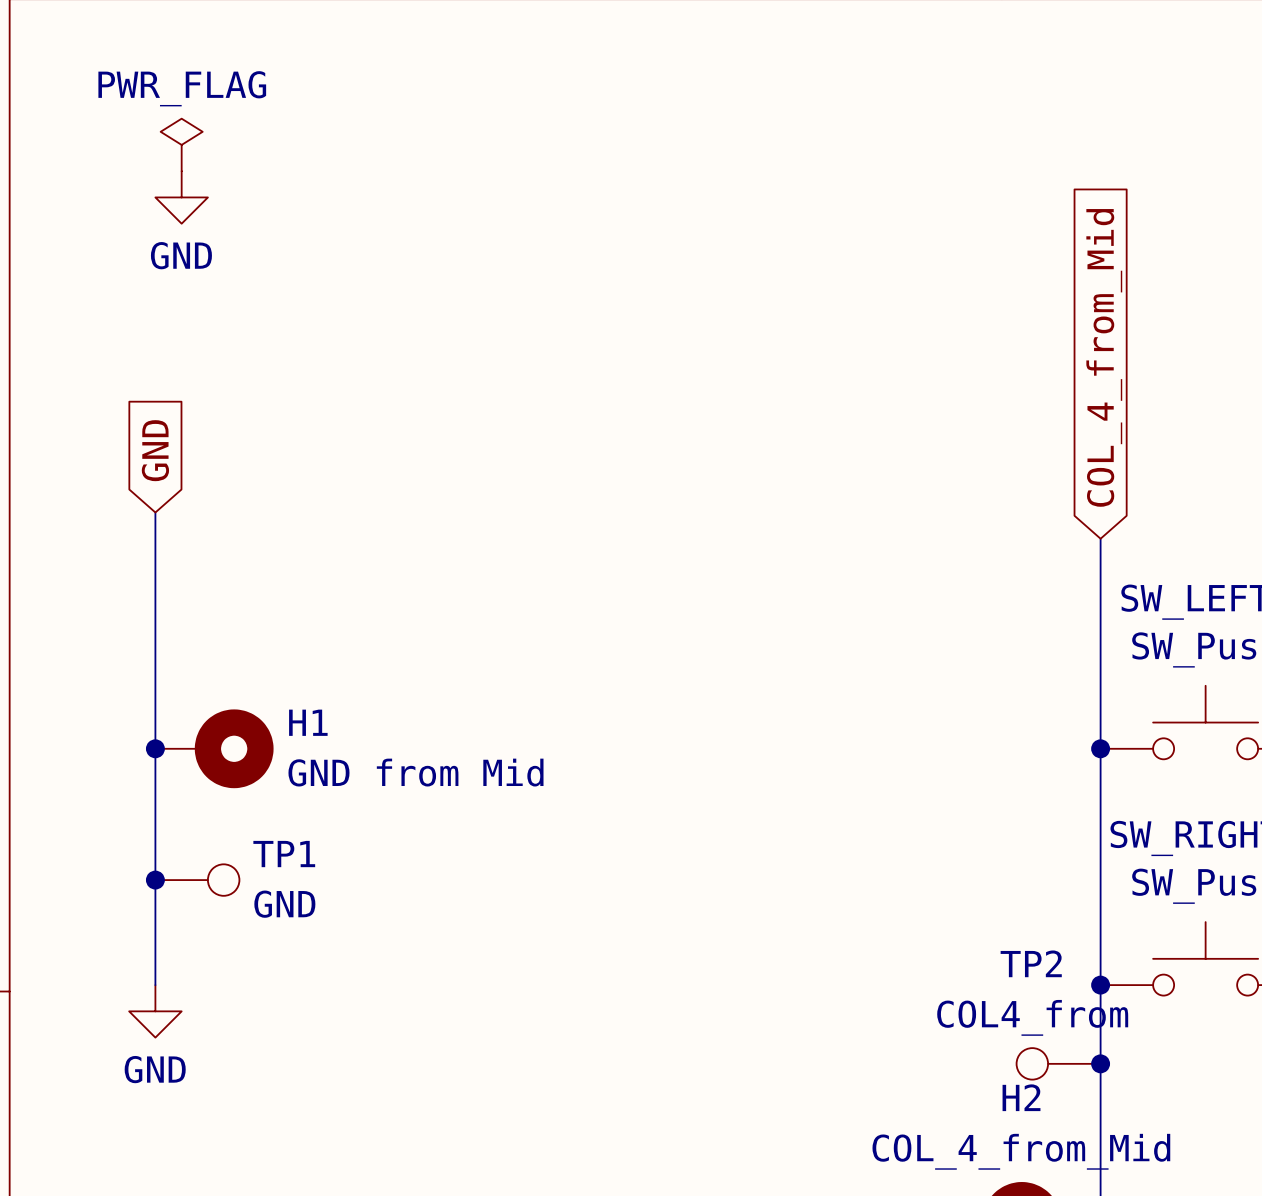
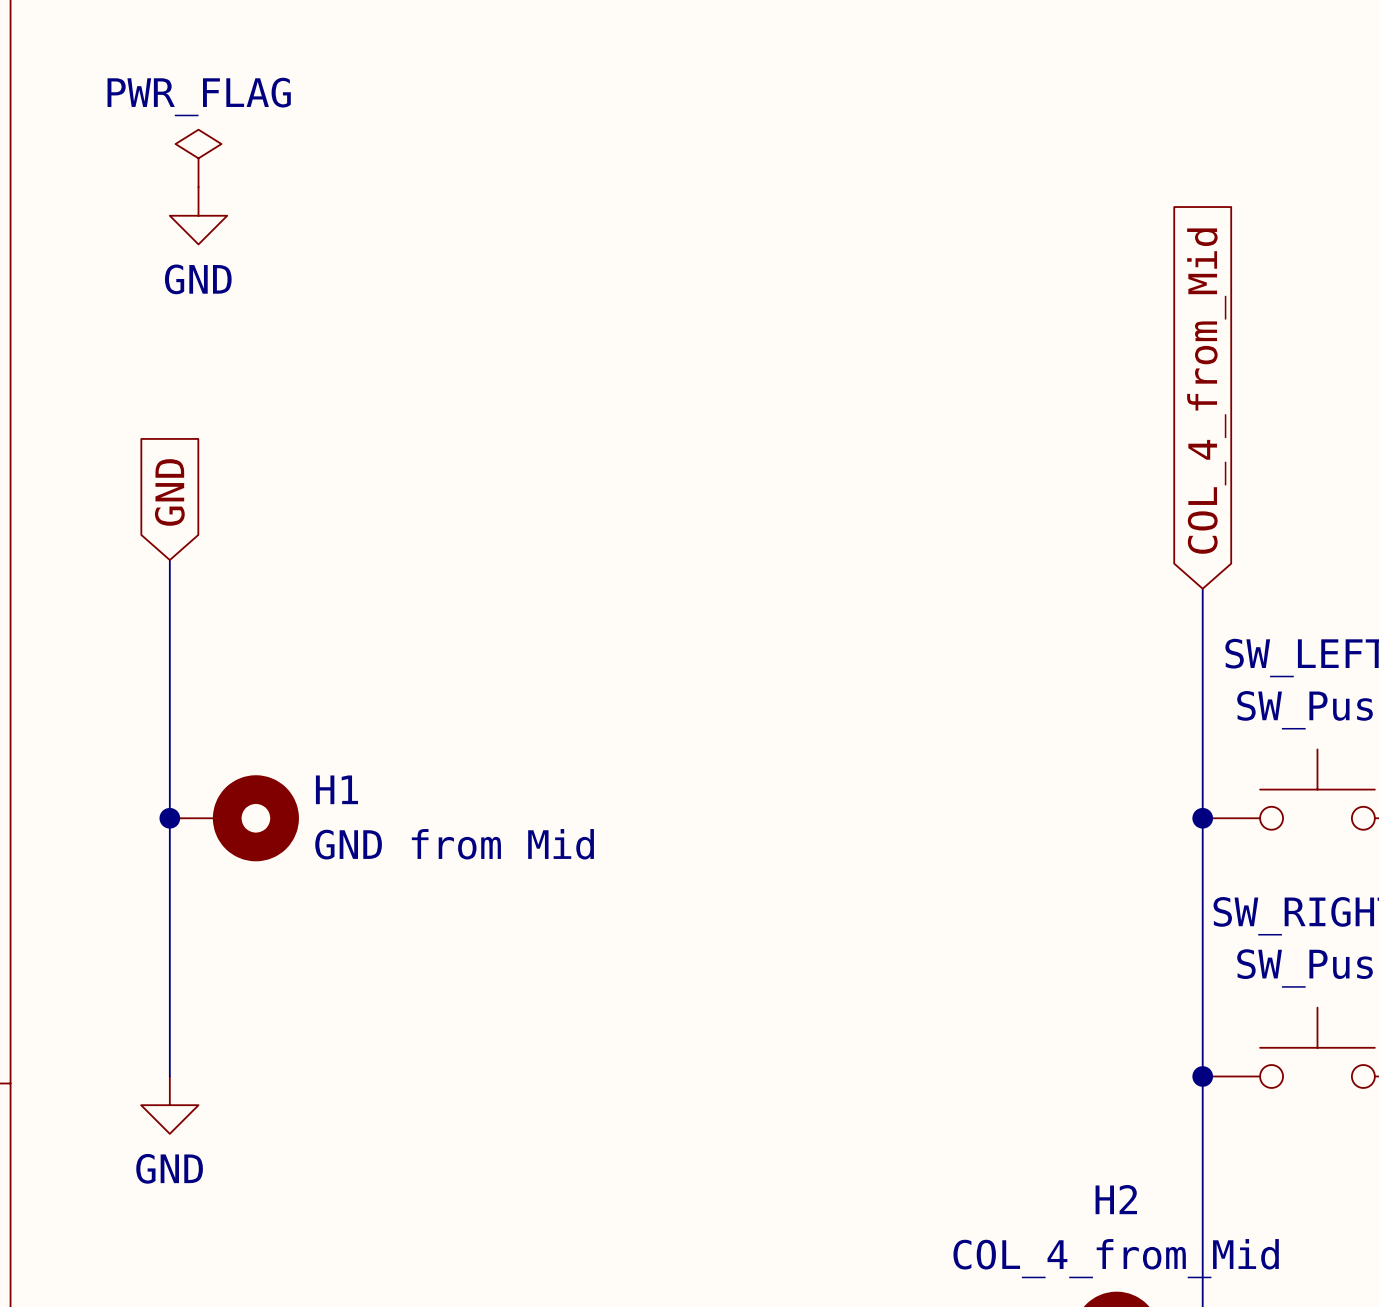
junction: (155, 880) -> none
TP1: GND (197, 880) -> none
TP2: COL4_from (1058, 1063) -> none
junction: (1100, 1063) -> none

